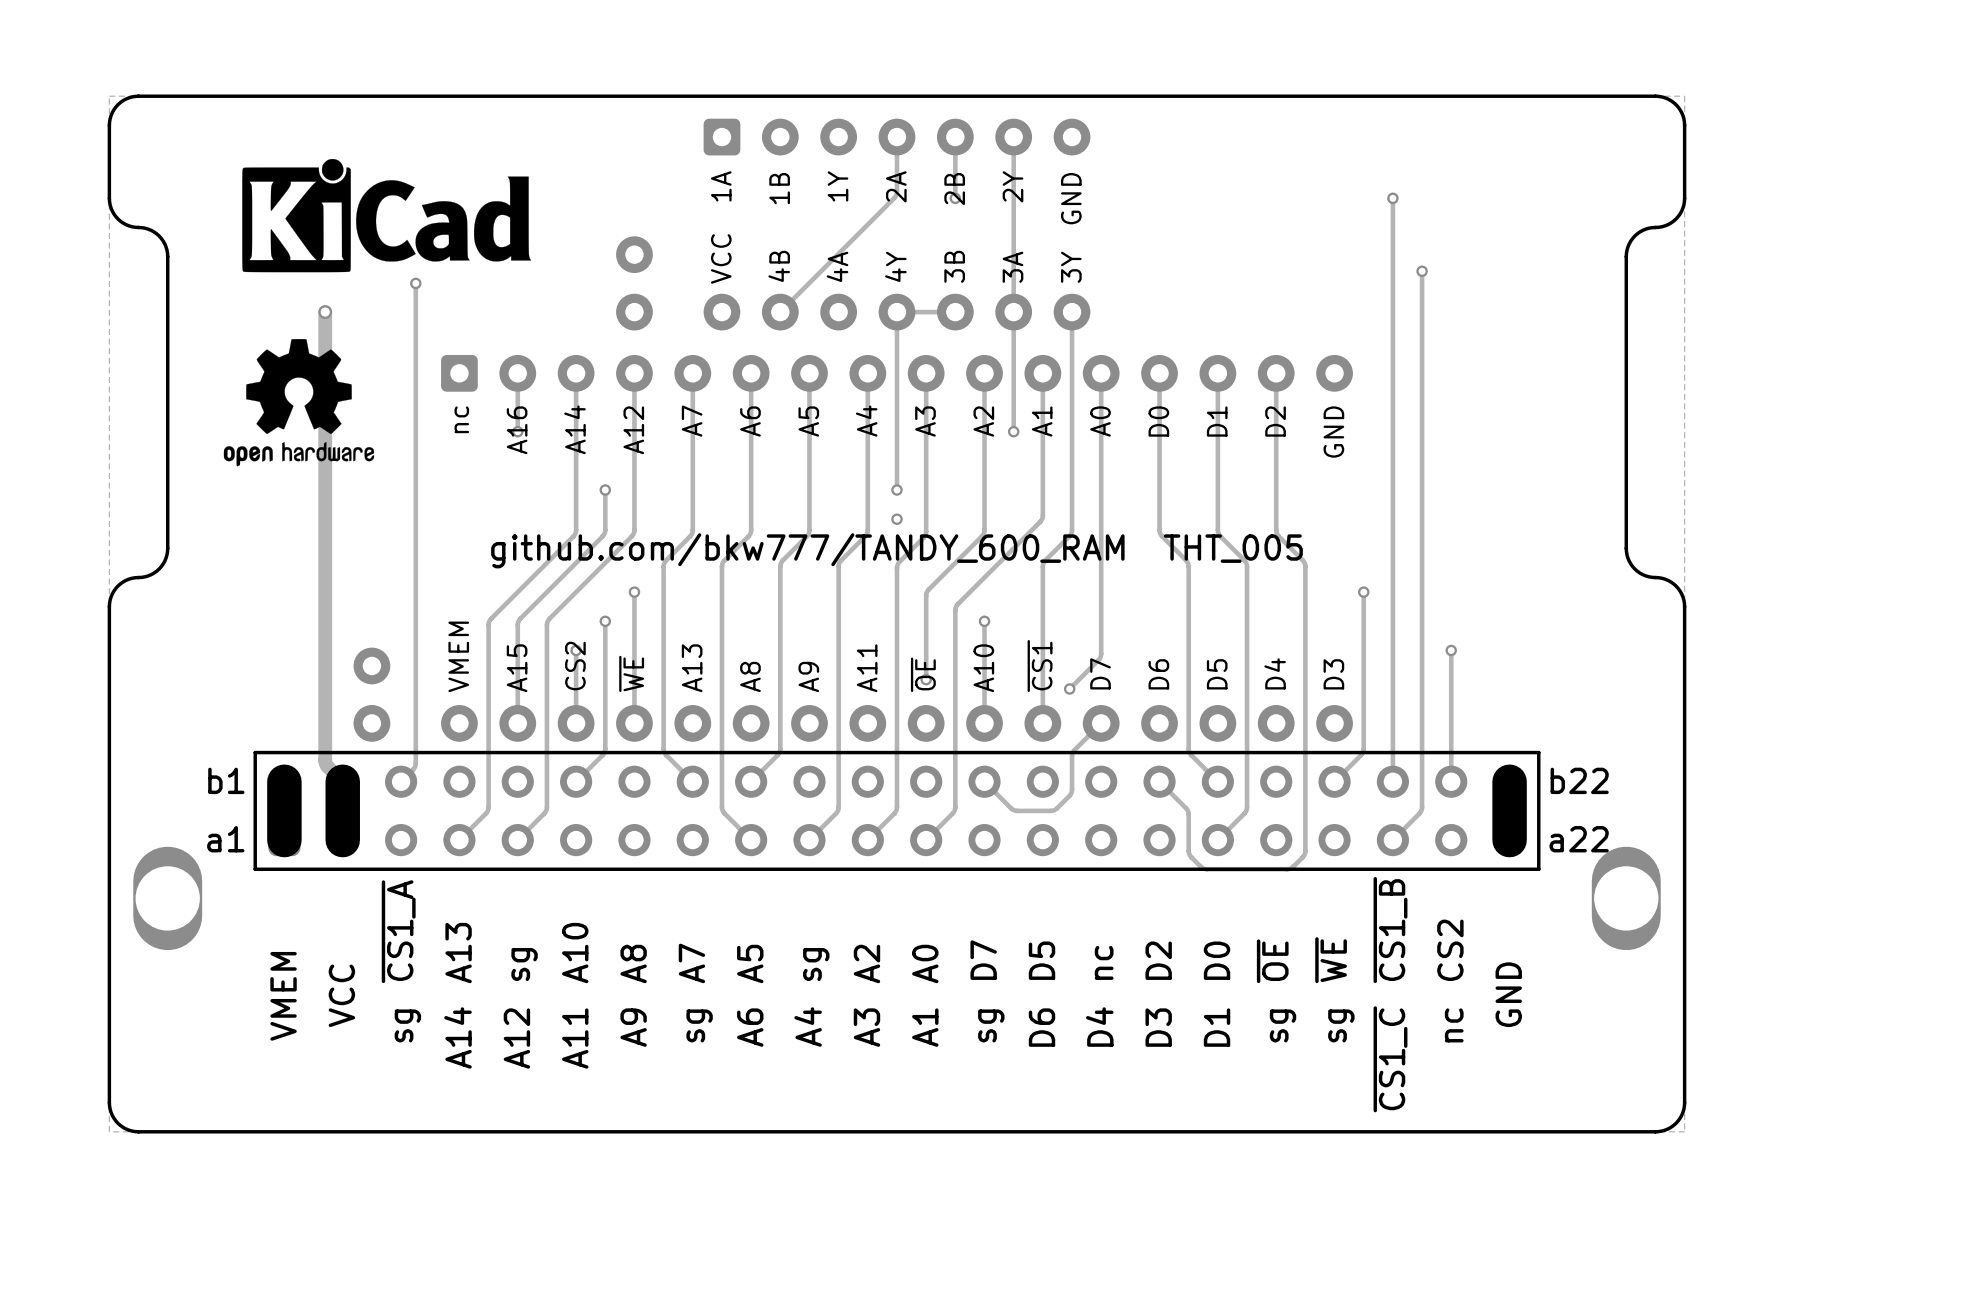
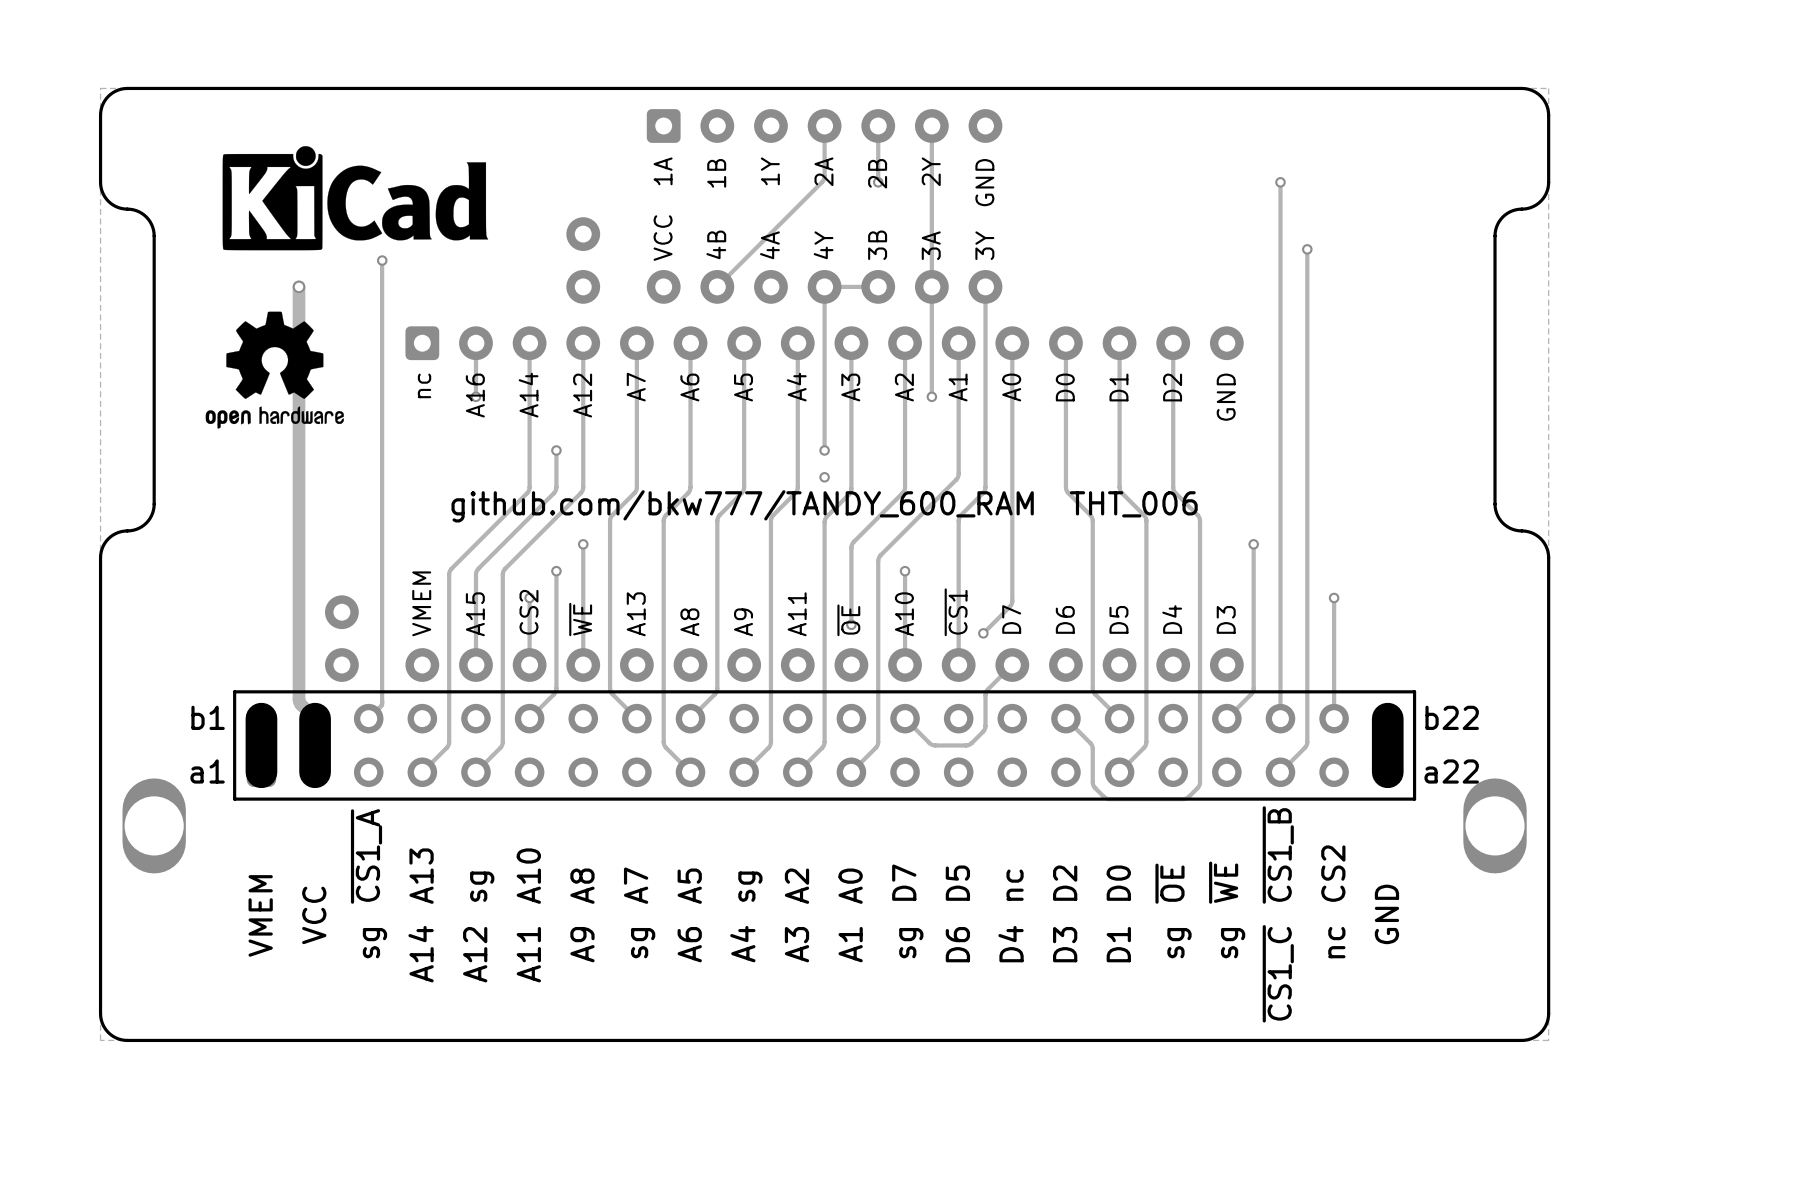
text: github.com/bkw777/TANDY_600_RAM THT_005 (897, 550) -> github.com/bkw777/TANDY_600_RAM THT_006 (824, 506)

